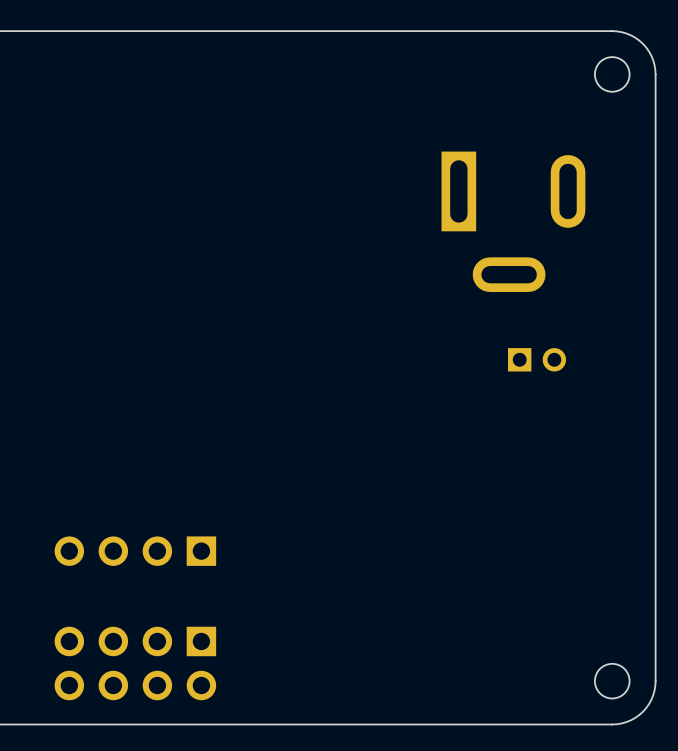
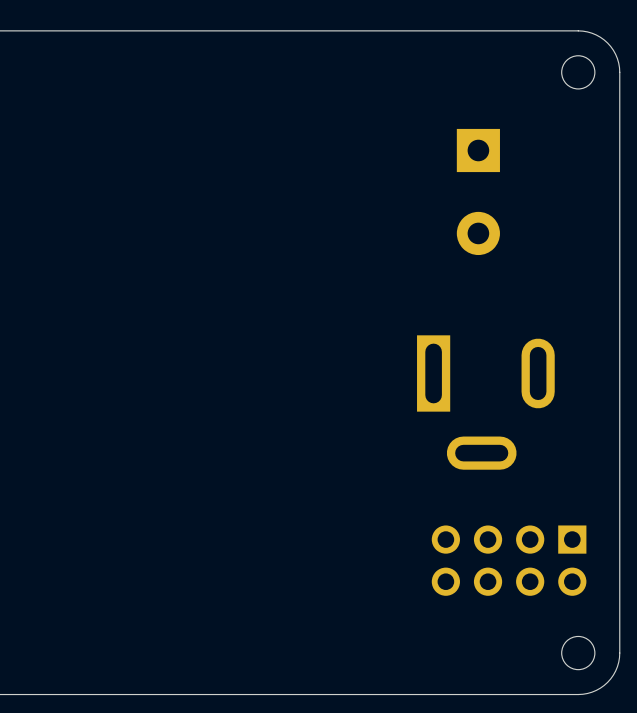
part: none -> (478, 191)
part position: (513, 221) -> (485, 402)
part: (537, 359) -> none
part: (135, 551) -> none
part position: (135, 663) -> (509, 560)

